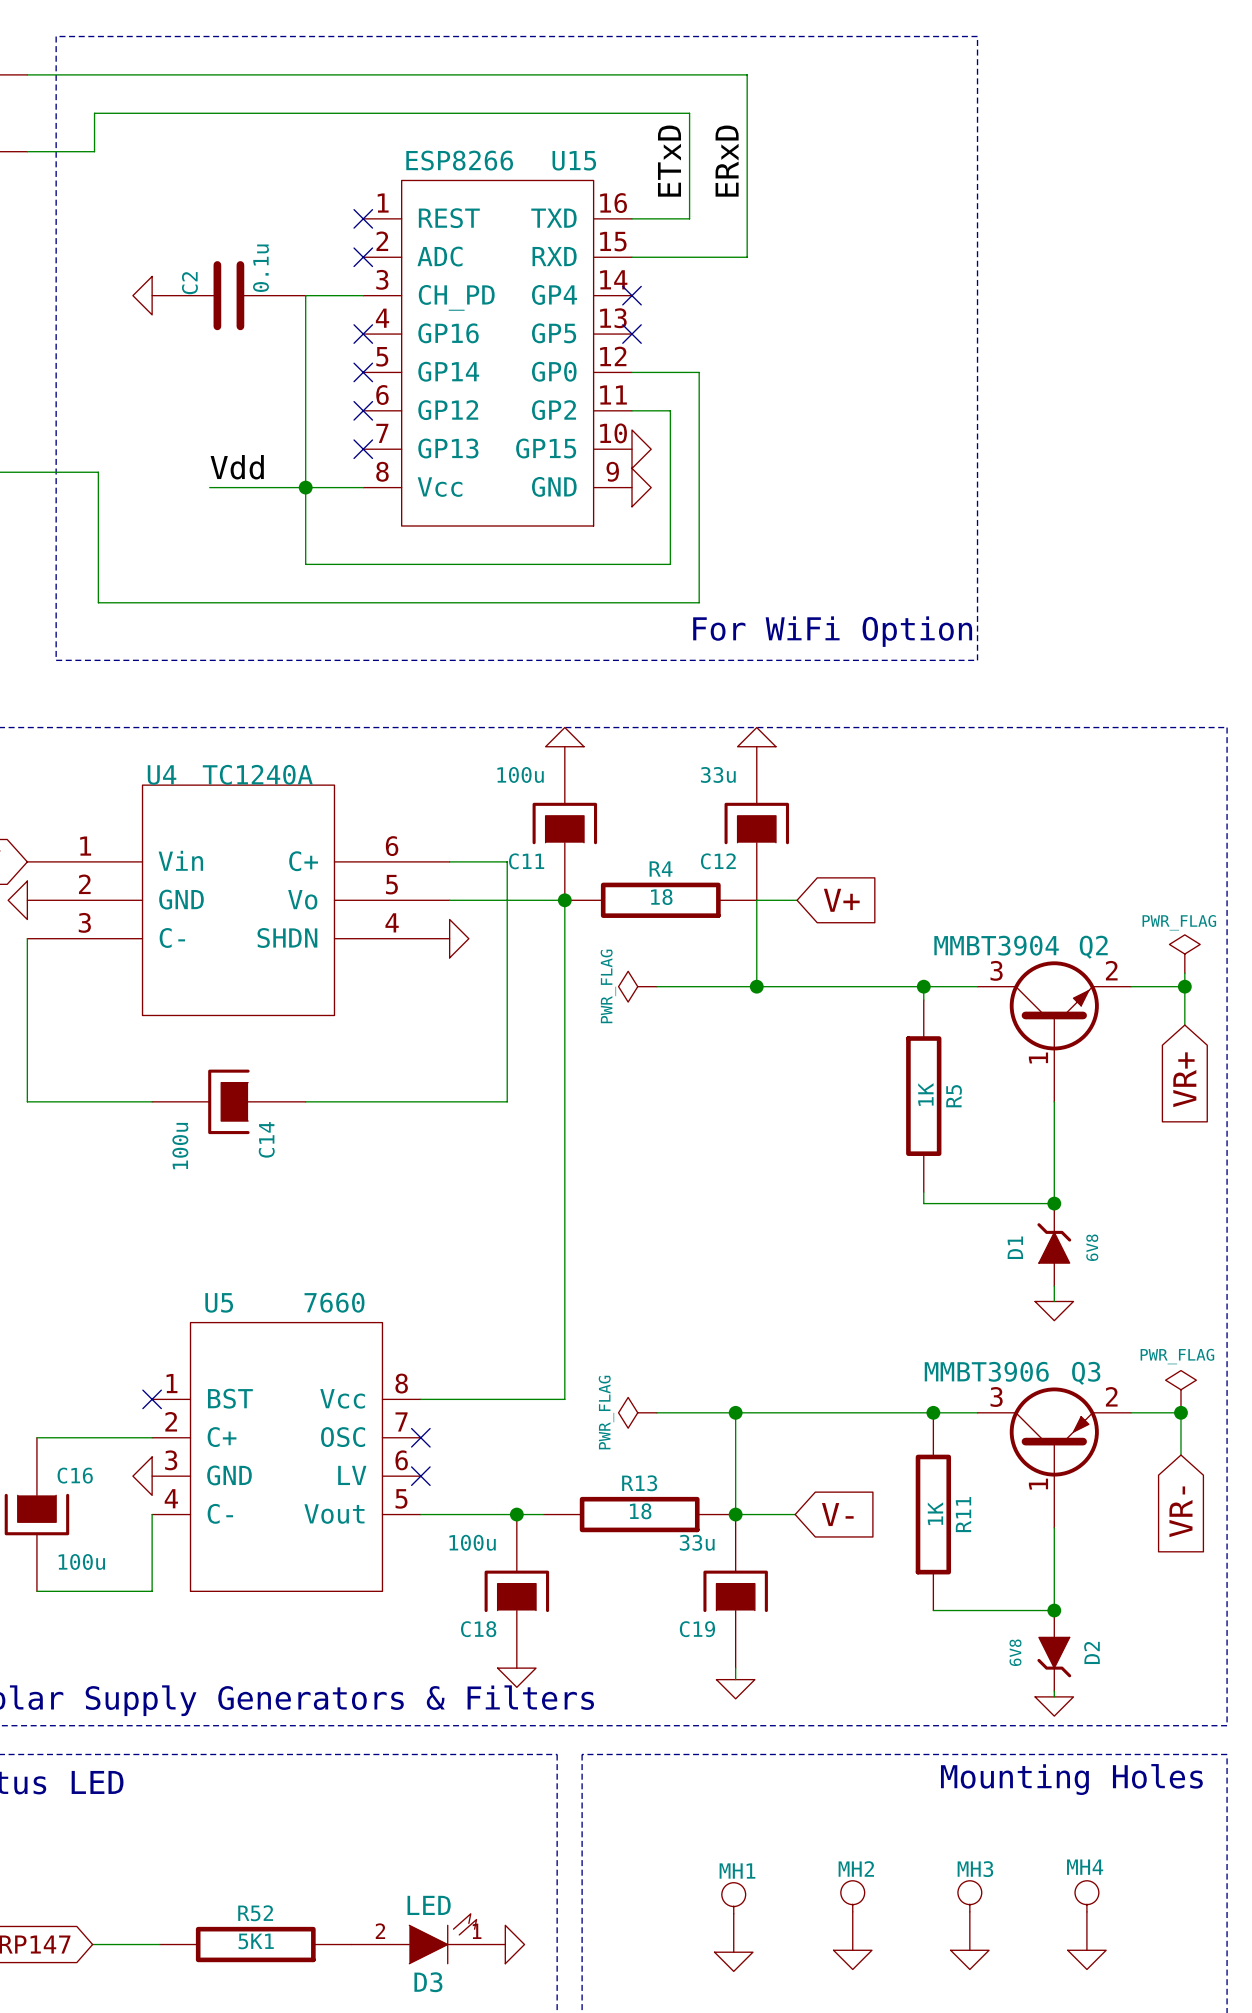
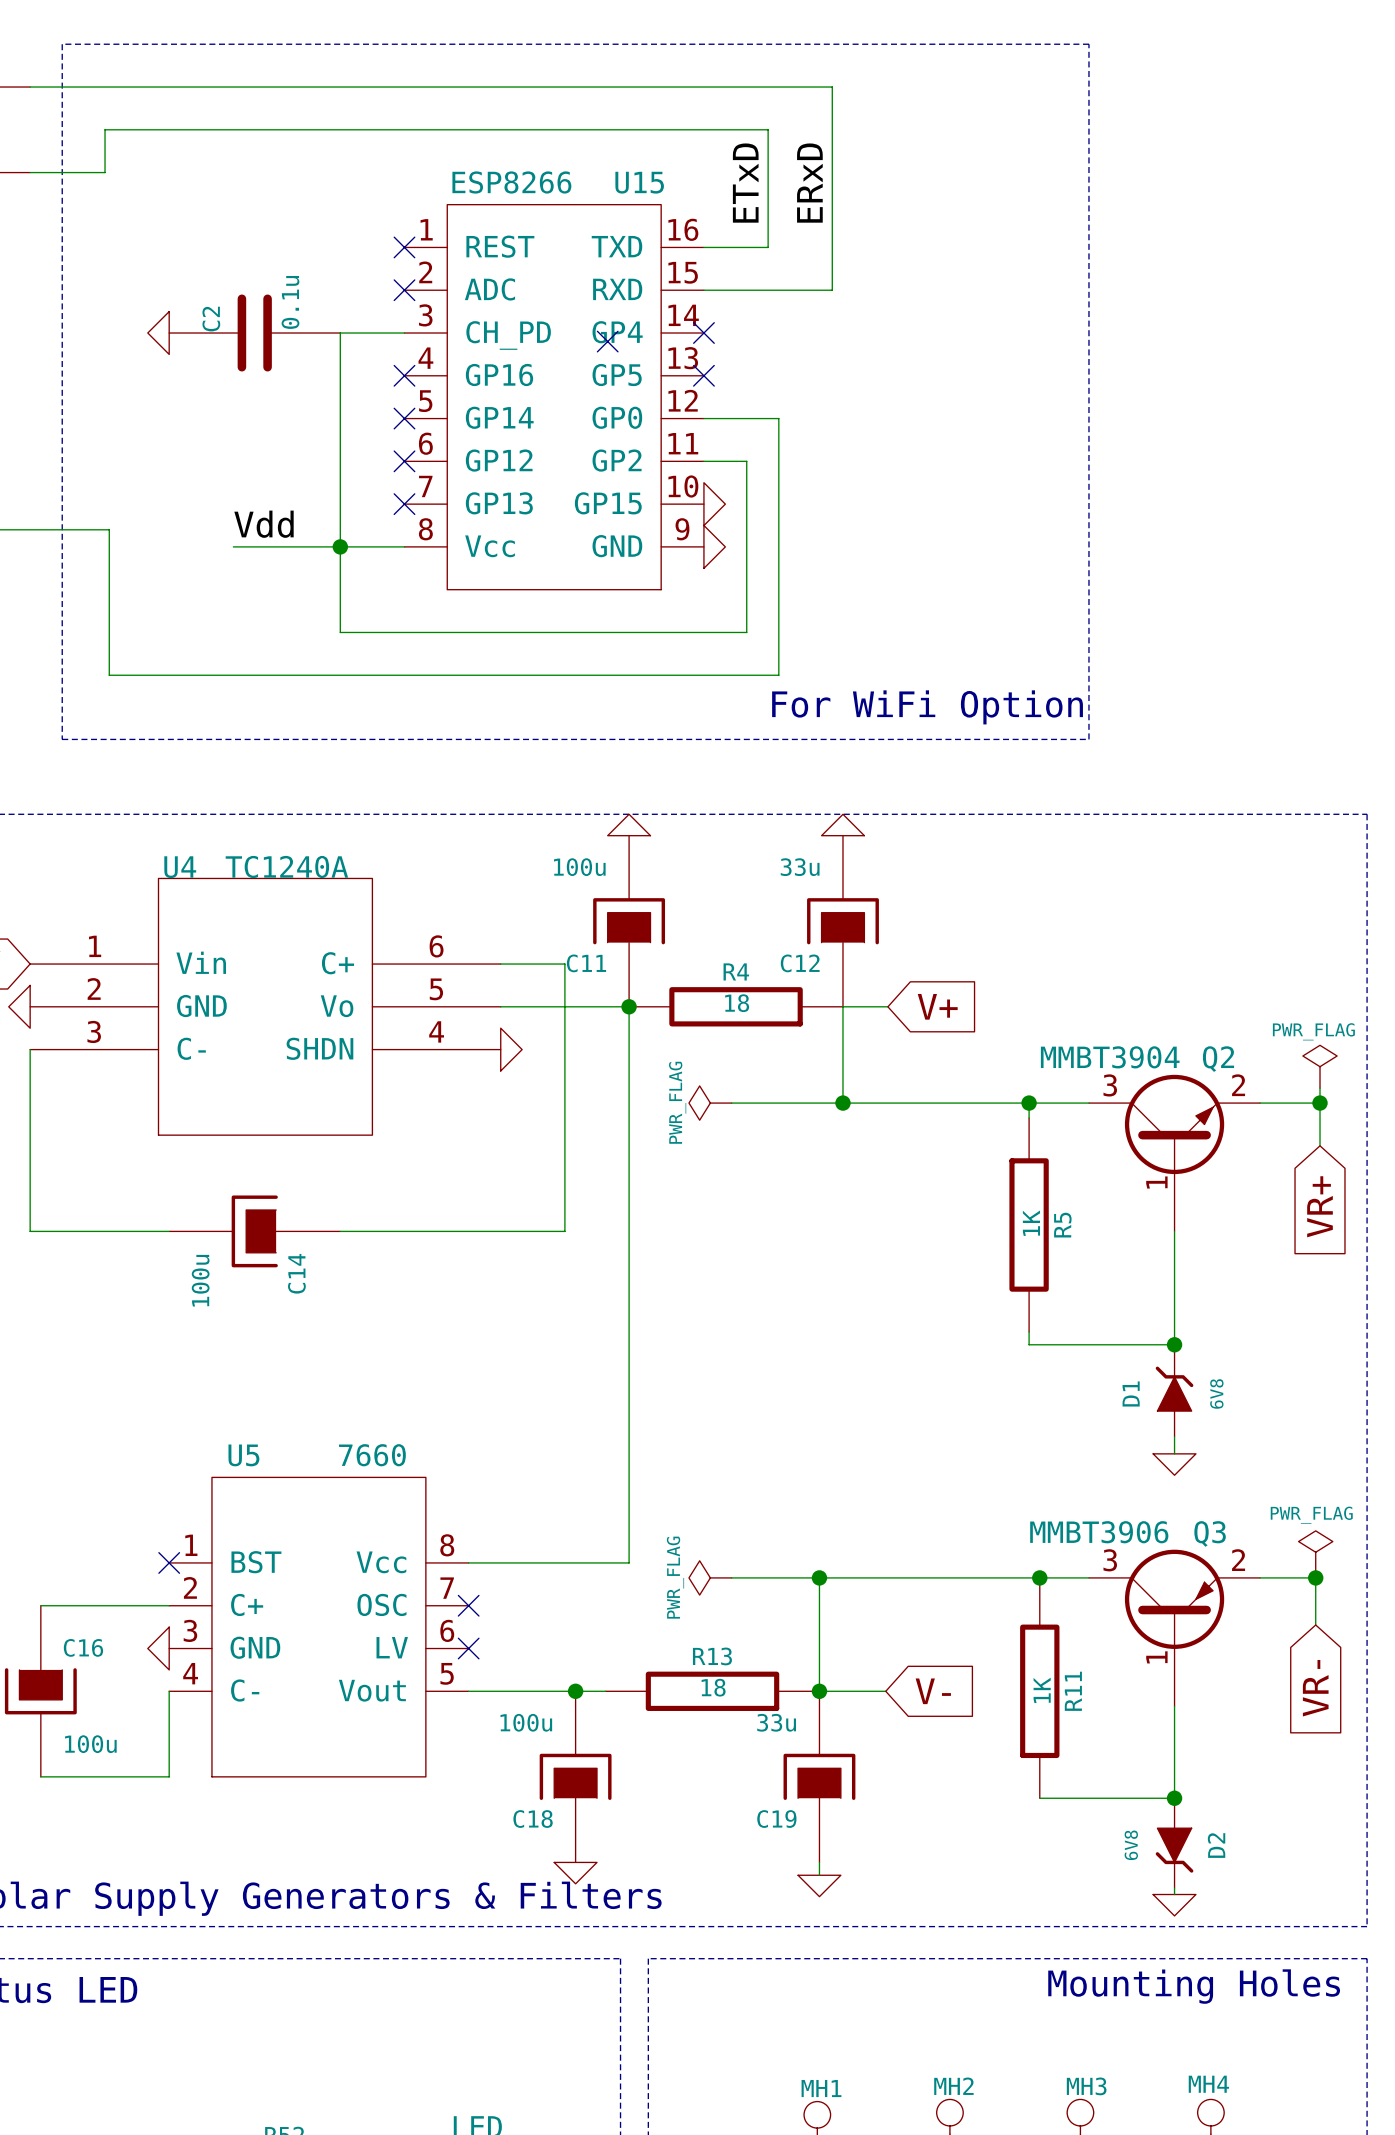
no-connect mark: none -> (607, 341)

